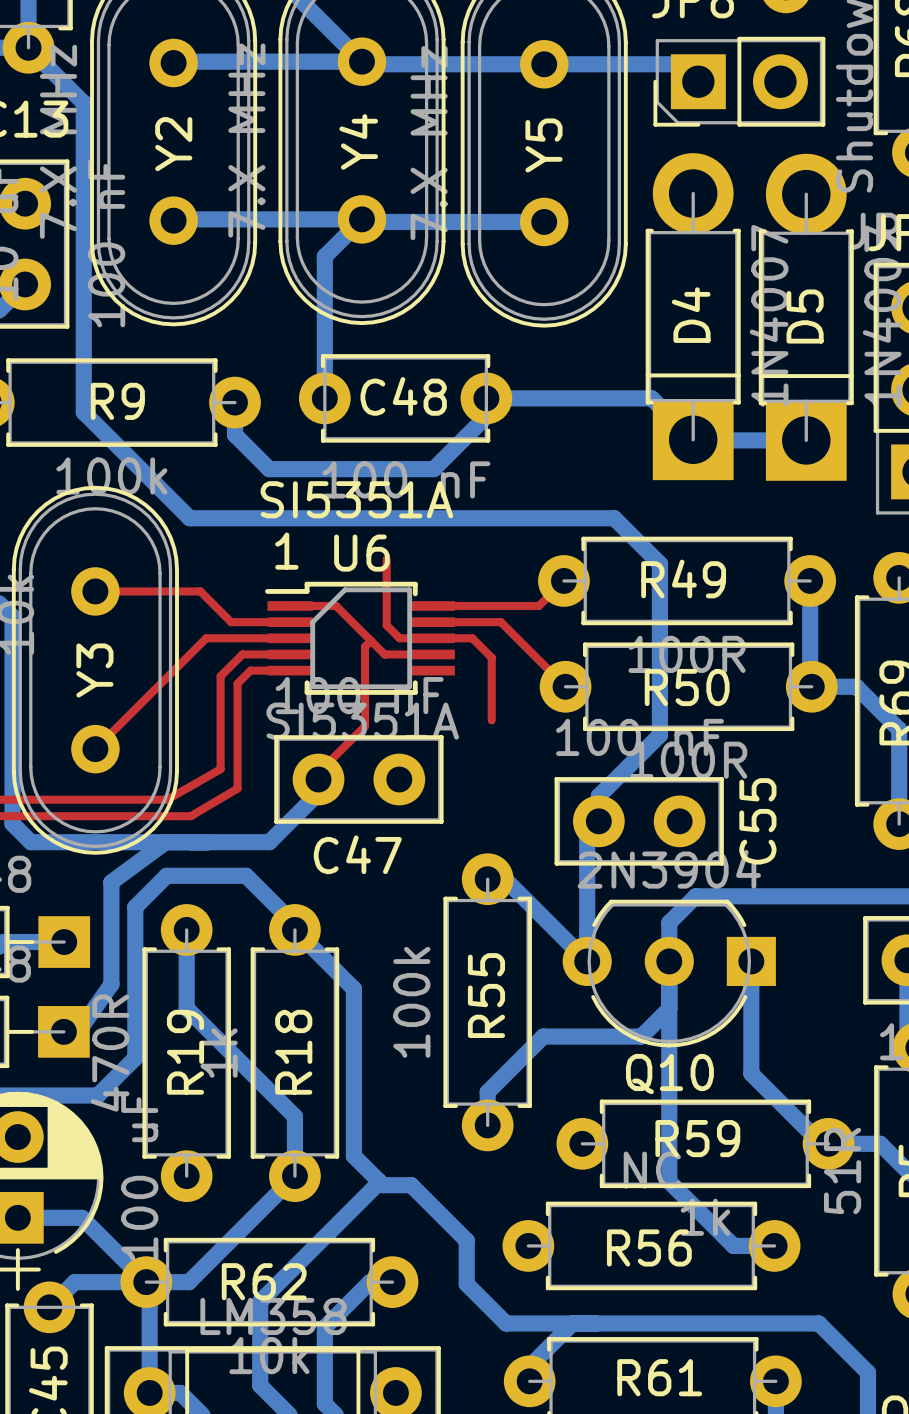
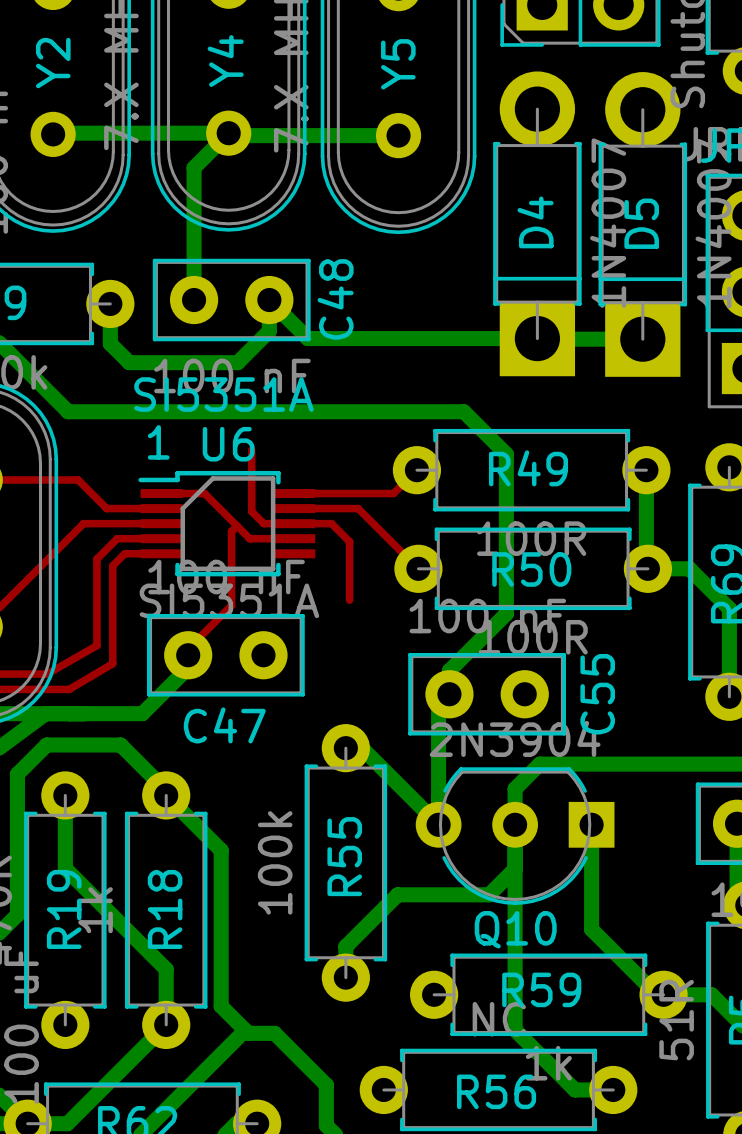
C48 footprint: [298, 354, 513, 443] -> [152, 258, 311, 342]
C48 name position: C48 (403, 396) -> C48 (335, 299)
bottom track: none -> (269, 300) (269, 331) (237, 362) (129, 362) (110, 343) (110, 334)
bottom track: (235, 434) (269, 469) (433, 469) (486, 416) (486, 398) (651, 398) (693, 439) -> (269, 300) (307, 338) (537, 338)

